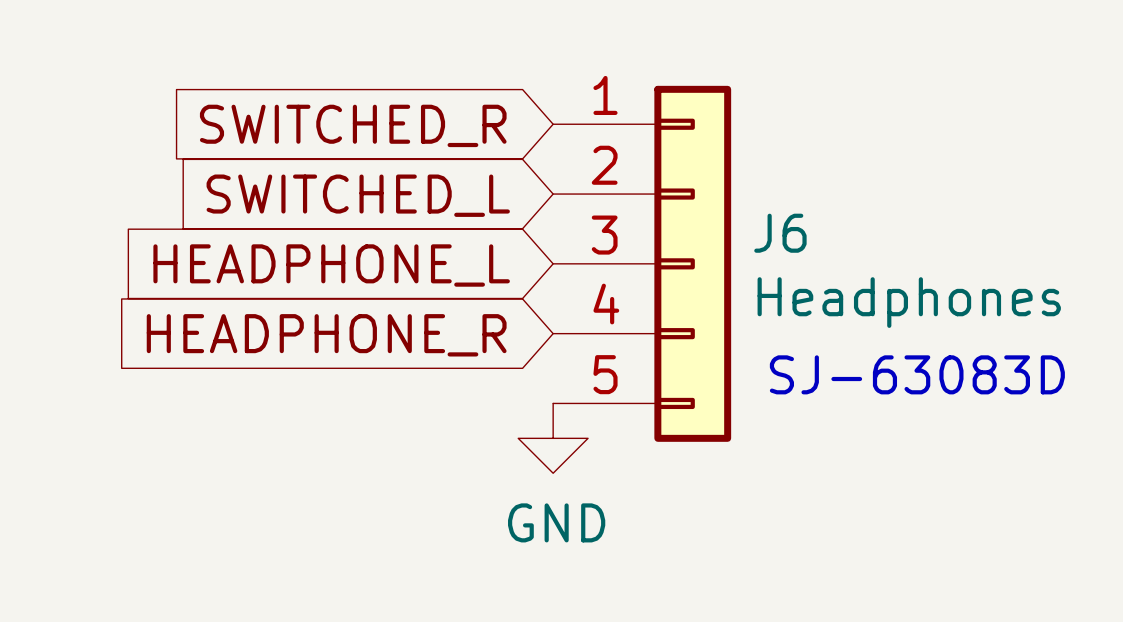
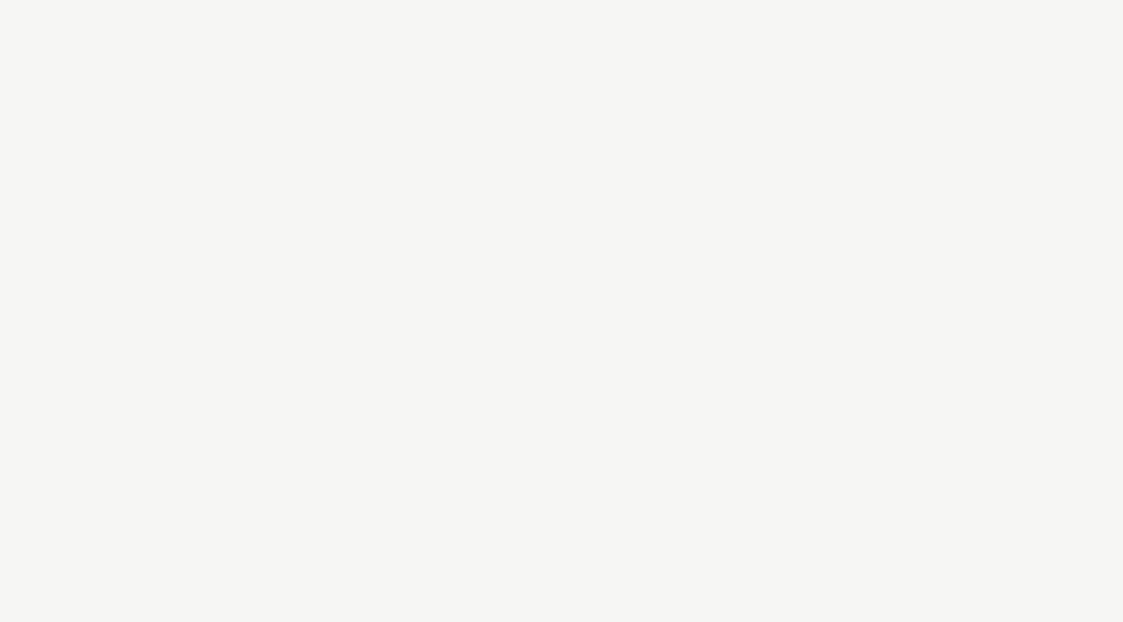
global label: SWITCHED_R (353, 125) -> none
global label: SWITCHED_L (358, 195) -> none
J6: Headphones (642, 263) -> none
global label: HEADPHONE_L (331, 265) -> none
global label: HEADPHONE_R (326, 335) -> none
text: SJ-63083D (917, 374) -> none
power symbol: GND (553, 438) -> none

